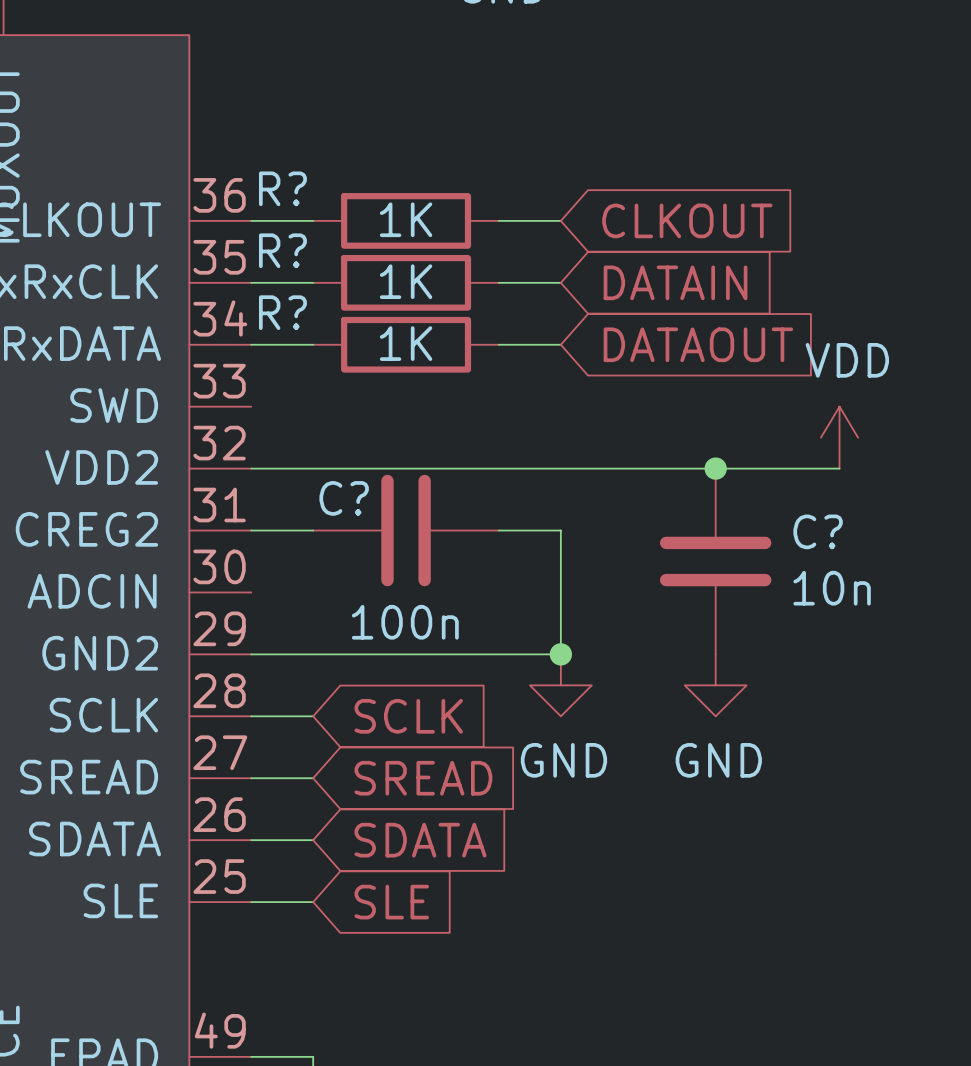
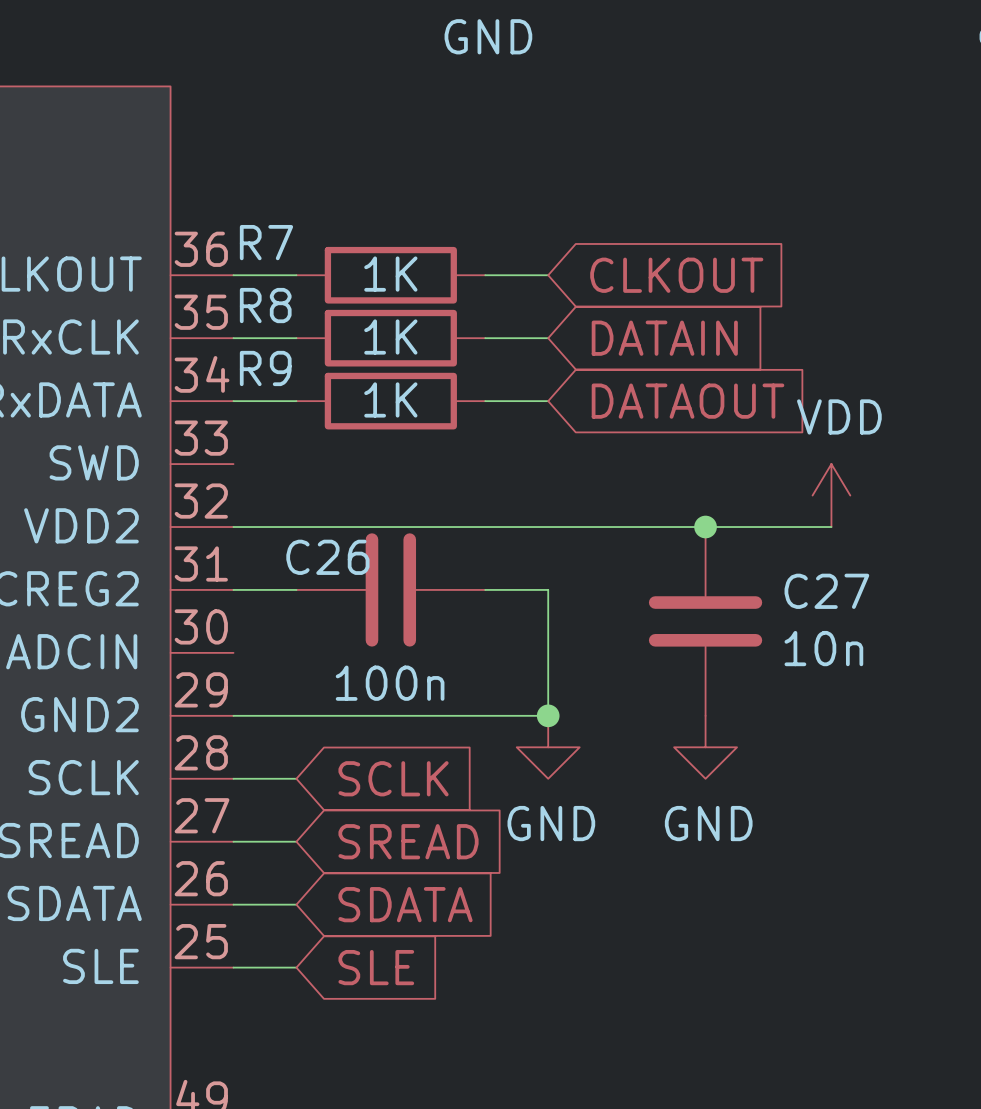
R? name: R? (282, 188) -> R7 (266, 242)
R? name: R? (282, 250) -> R8 (265, 305)
R? name: R? (282, 312) -> R9 (265, 368)
C? name: C? (344, 498) -> C26 (327, 557)
C? name: C? (818, 531) -> C27 (826, 591)

